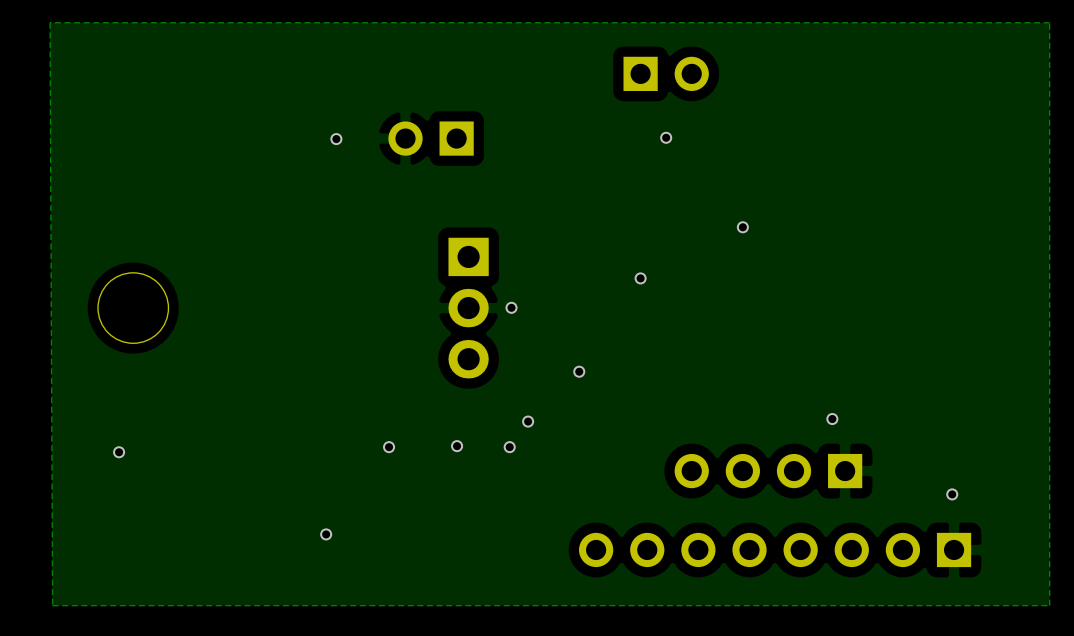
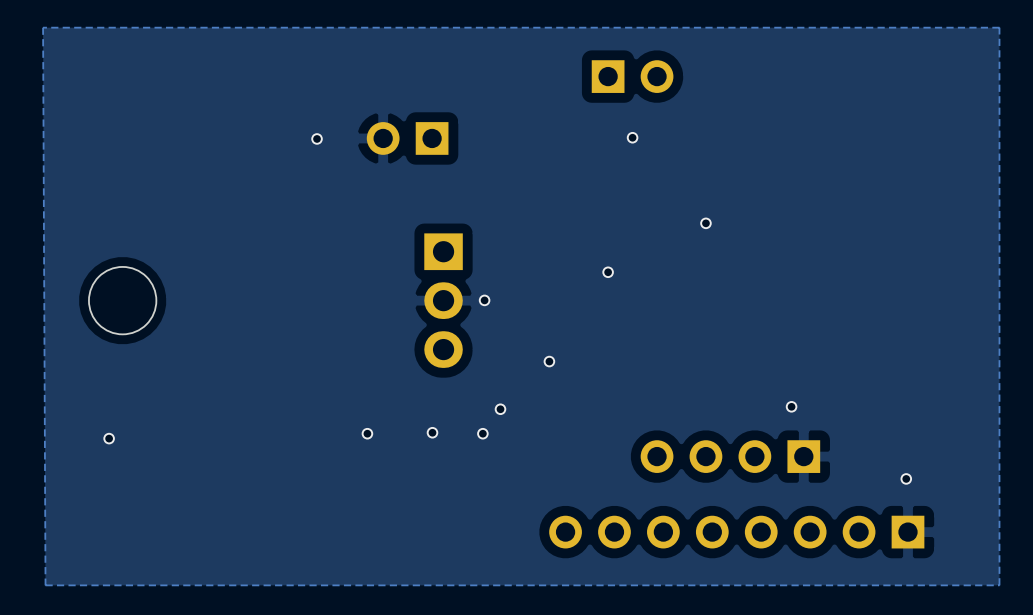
via: (326, 534) -> none

